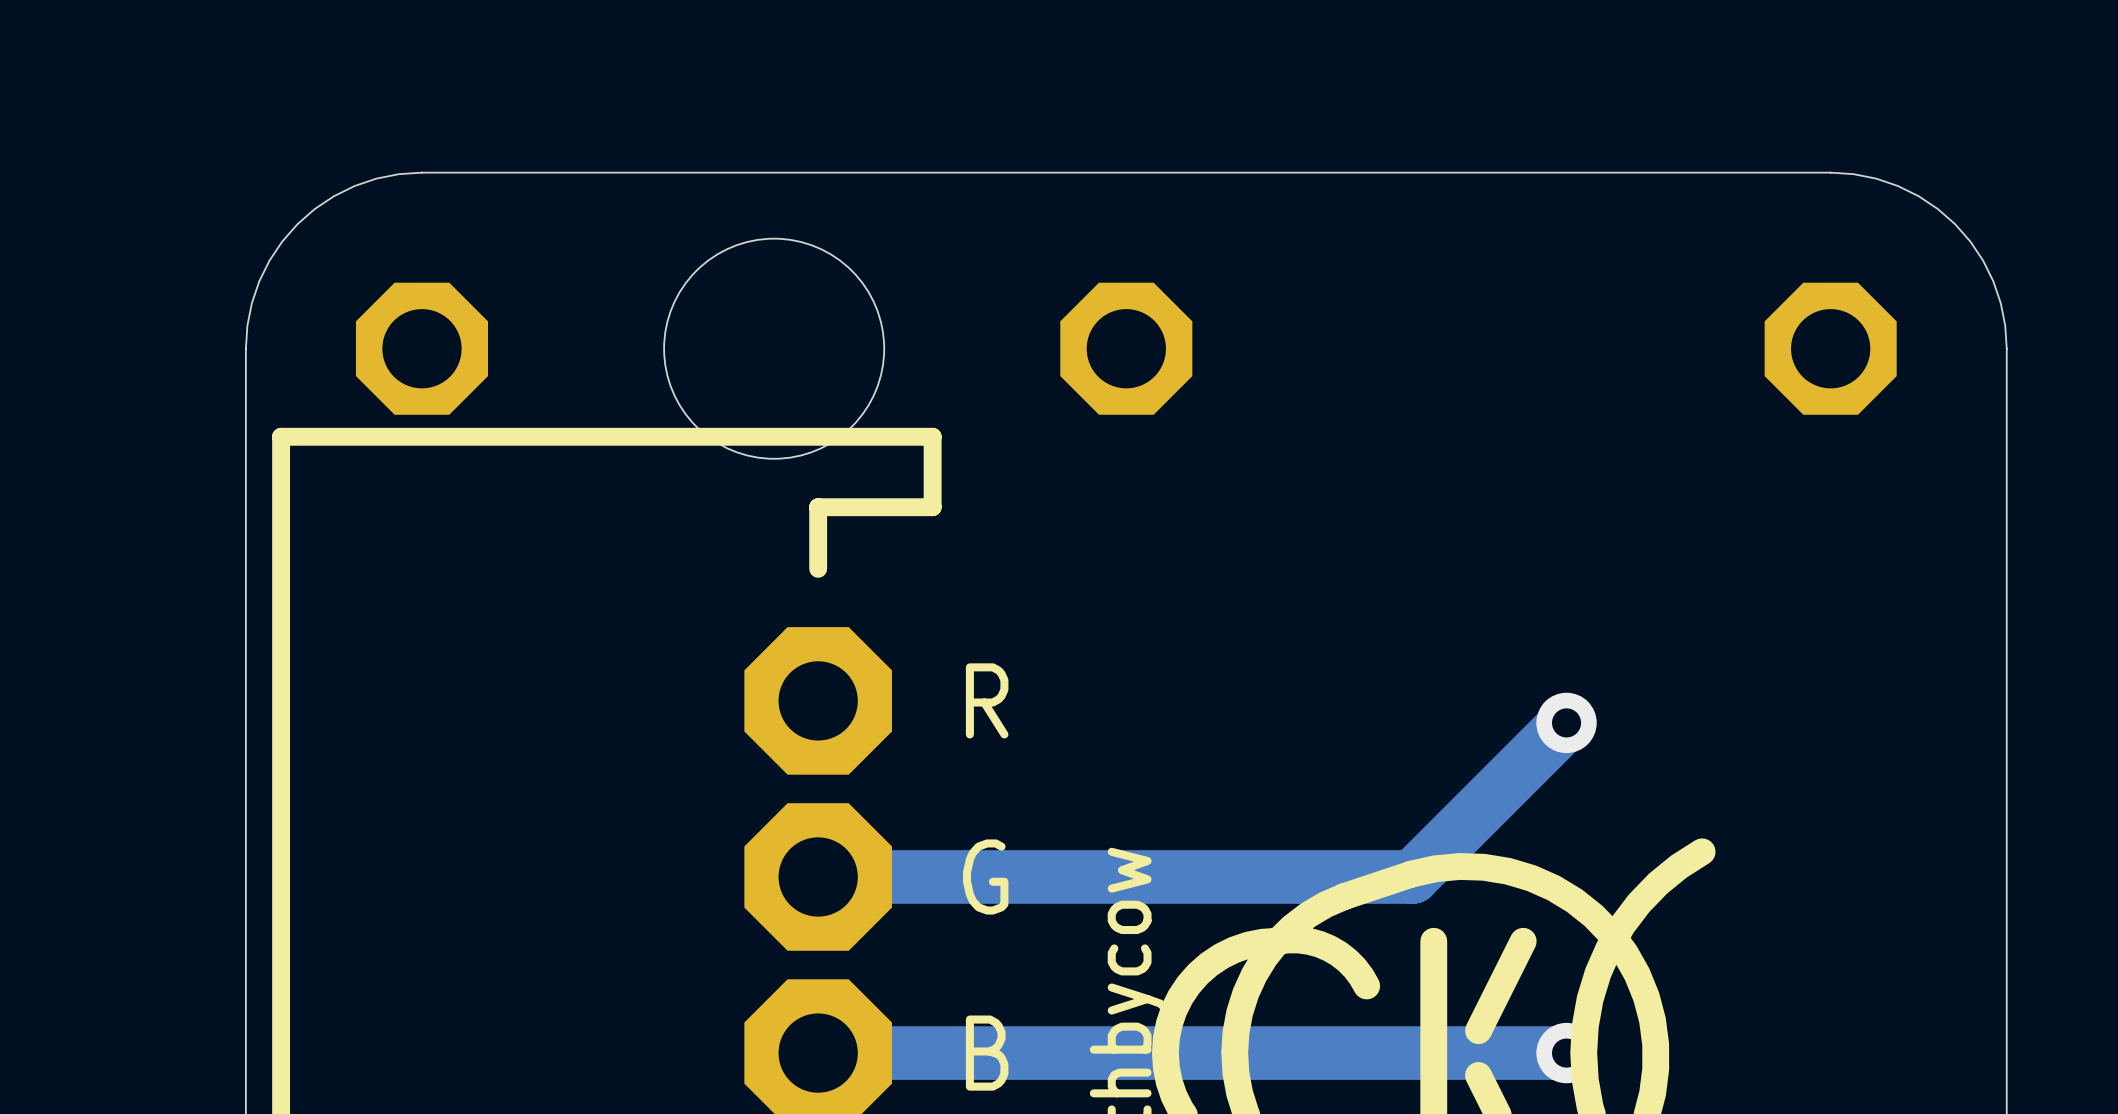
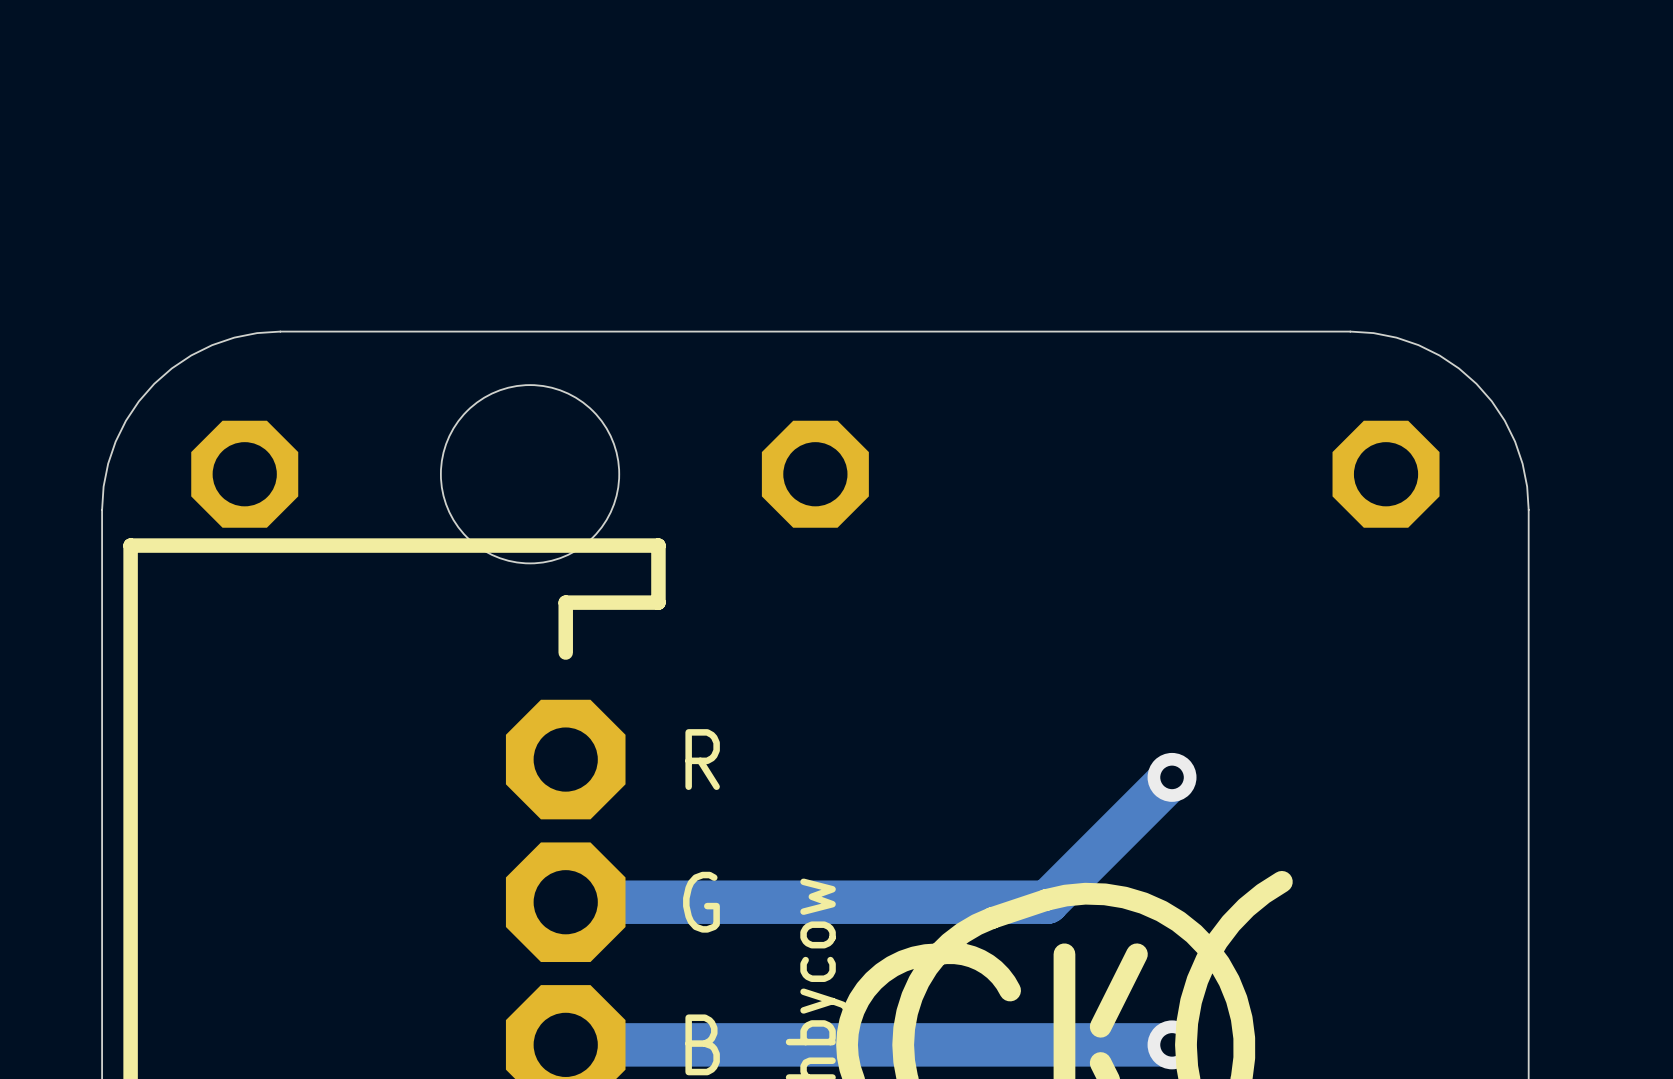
board edge: (466, 172) (398, 174) (376, 178) (354, 186) (333, 196) (314, 209) (297, 224) (282, 241) (269, 260) (259, 281) (251, 303) (247, 325) (245, 392) -> (280, 331) (257, 333) (234, 337) (212, 345) (191, 355) (171, 368) (154, 383) (138, 401) (125, 420) (115, 441) (108, 463) (103, 486) (102, 509)
board edge: (1786, 172) (1853, 174) (1876, 178) (1898, 186) (1918, 196) (1937, 209) (1955, 224) (1970, 241) (1983, 260) (1993, 281) (2000, 303) (2005, 325) (2006, 392) -> (1350, 331) (1373, 333) (1396, 337) (1418, 345) (1439, 355) (1458, 368) (1476, 383) (1491, 401) (1504, 420) (1515, 441) (1522, 463) (1527, 486) (1528, 509)

